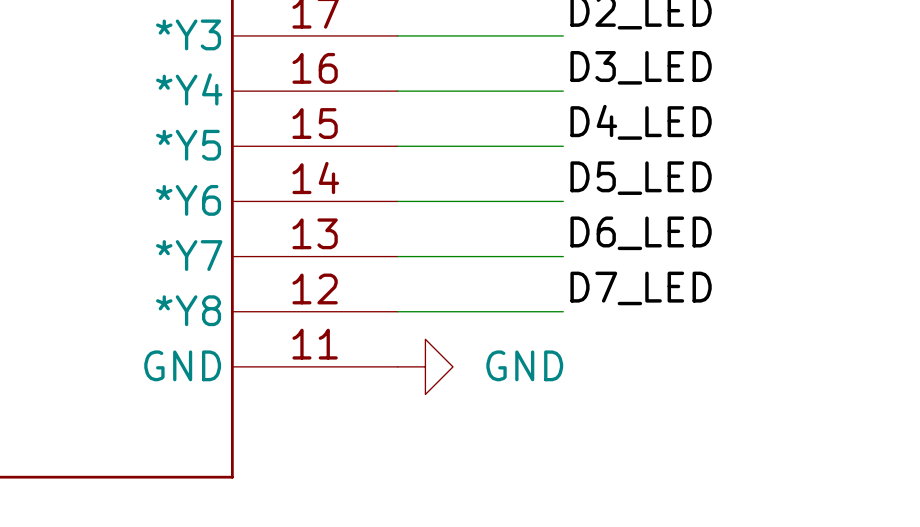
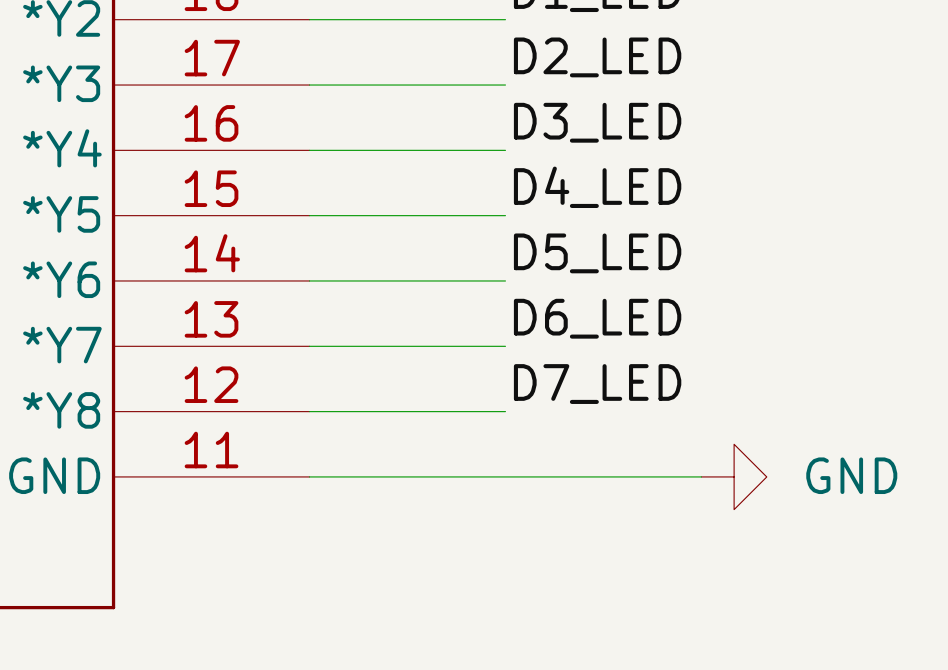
wire: none -> (309, 476) (701, 476)
power symbol position: GND (425, 366) -> GND (734, 476)

